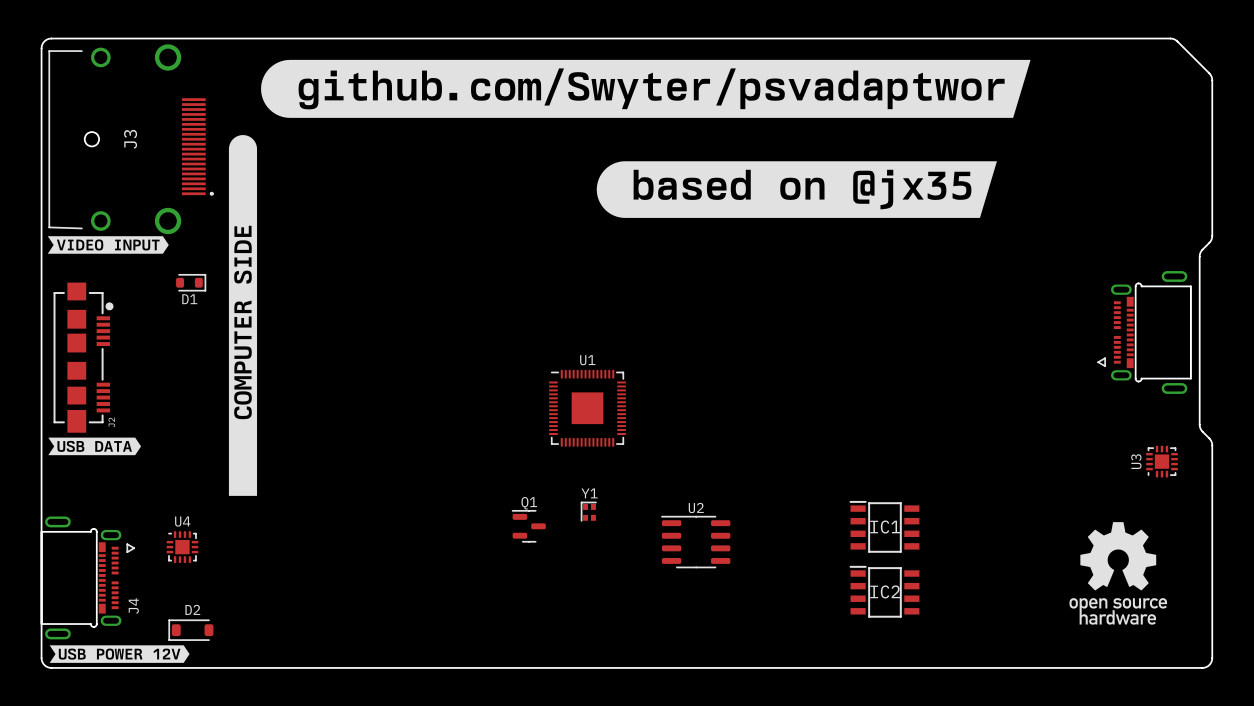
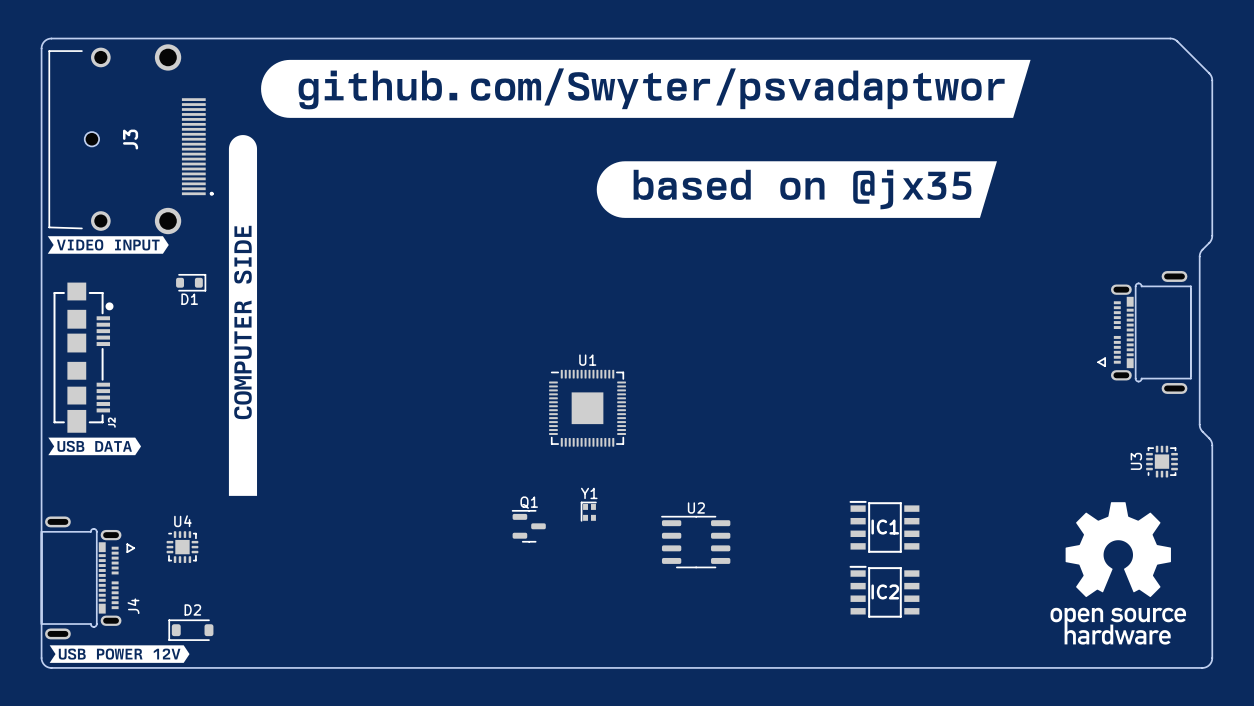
drawing shape: [1080, 522, 1157, 591] -> [1065, 502, 1171, 597]
drawing: [1069, 598, 1168, 625] -> none
drawing shape: [1079, 598, 1088, 625] -> [1077, 607, 1090, 623]
drawing: none -> [1050, 607, 1187, 645]
drawing shape: [1140, 614, 1148, 625] -> [1138, 607, 1150, 623]

